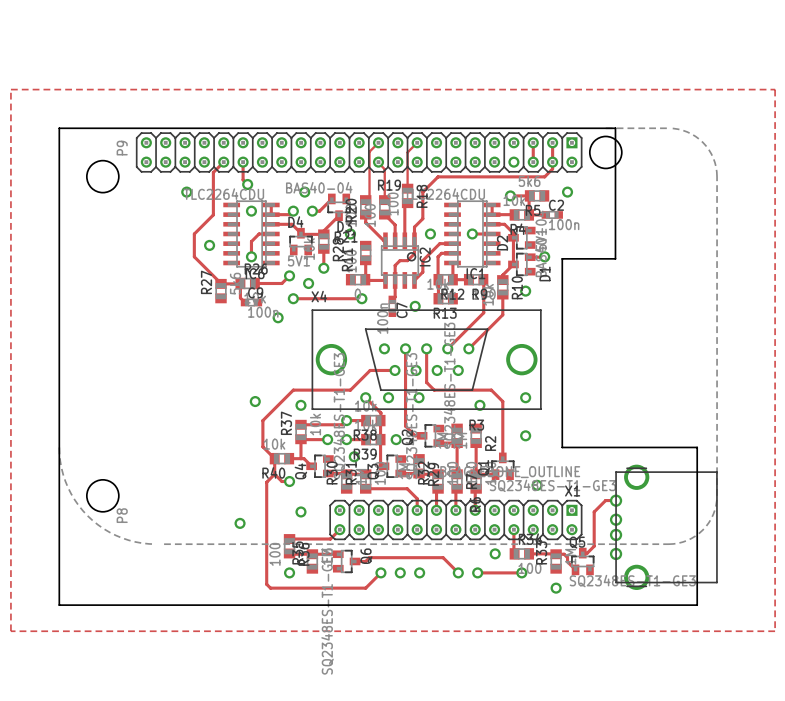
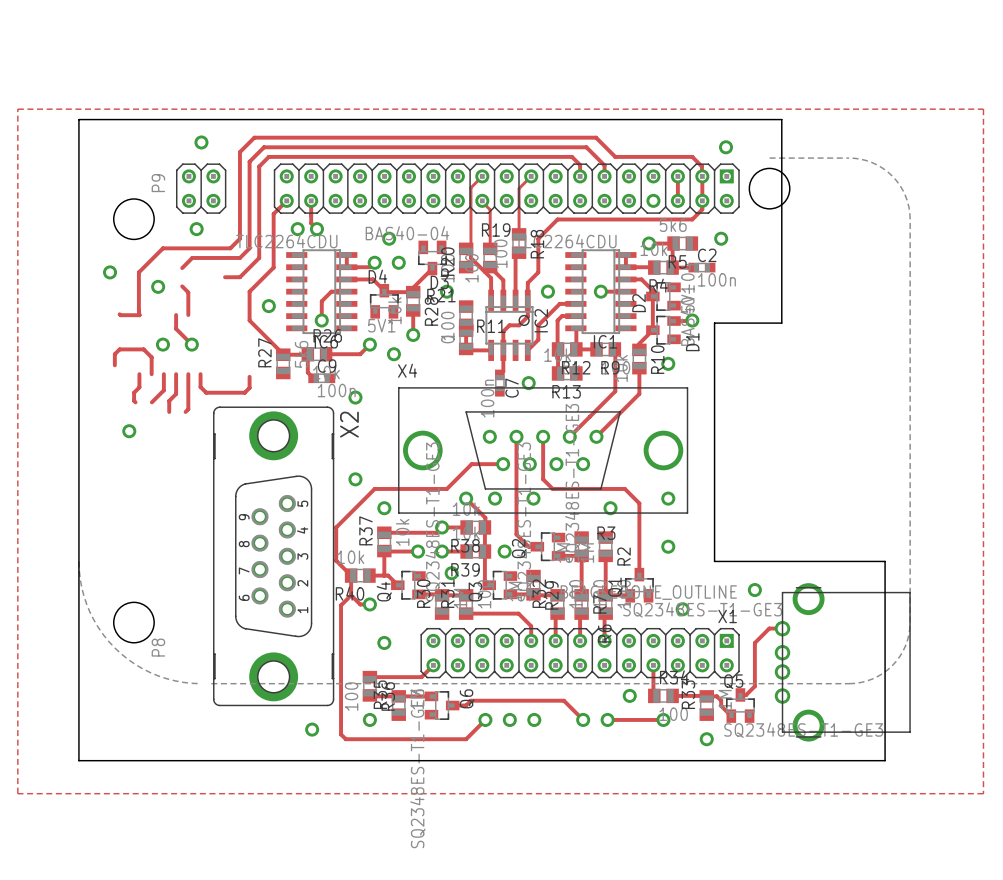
via: none -> (201, 142)
via: none -> (726, 147)
X1 footprint: [58, 127, 718, 606] -> [78, 118, 911, 762]
track: none -> (580, 176) (580, 165) (572, 156) (268, 156) (259, 166) (259, 257) (239, 277) (225, 277)
track: none -> (604, 176) (604, 165) (586, 147) (264, 147) (249, 161) (249, 248) (239, 257) (192, 257) (182, 268)
track: none -> (702, 176) (701, 166) (692, 156) (615, 156) (596, 137) (254, 137) (239, 152) (239, 238) (230, 248) (162, 248) (138, 272) (139, 315) (119, 314)
via: none -> (196, 229)
via: none -> (297, 229)
via: (186, 192) -> none
track: (331, 198) (319, 211) (312, 211) -> none
via: (251, 211) -> none
track: (365, 214) (365, 222) (385, 240) -> (470, 252) (470, 257) (491, 278) (491, 300)
via: none -> (110, 272)
track: none -> (182, 286) (188, 292) (188, 315)
via: none -> (158, 286)
track: none -> (176, 315) (176, 328) (191, 344)
via: none -> (162, 344)
via: none -> (191, 344)
R11 rotation: 0° (358, 279) -> 90° clockwise (466, 339)
track: none -> (114, 365) (114, 354) (119, 349) (143, 349) (151, 357) (151, 374)
track: (293, 298) (361, 298) -> none
via: (293, 298) -> none
via: (361, 298) -> none
track: none -> (139, 374) (139, 387) (134, 392) (135, 402)
track: none -> (163, 374) (163, 390) (151, 402)
track: none -> (176, 374) (176, 394) (169, 400) (169, 411)
track: none -> (188, 374) (188, 409) (185, 411)
track: none -> (200, 374) (200, 387) (206, 392) (244, 392) (249, 387) (249, 376)
via: none -> (129, 431)
via position: (255, 401) -> (355, 479)
X2: none -> (273, 556)
via: none -> (754, 590)
via: (240, 523) -> none
via: none -> (312, 729)

